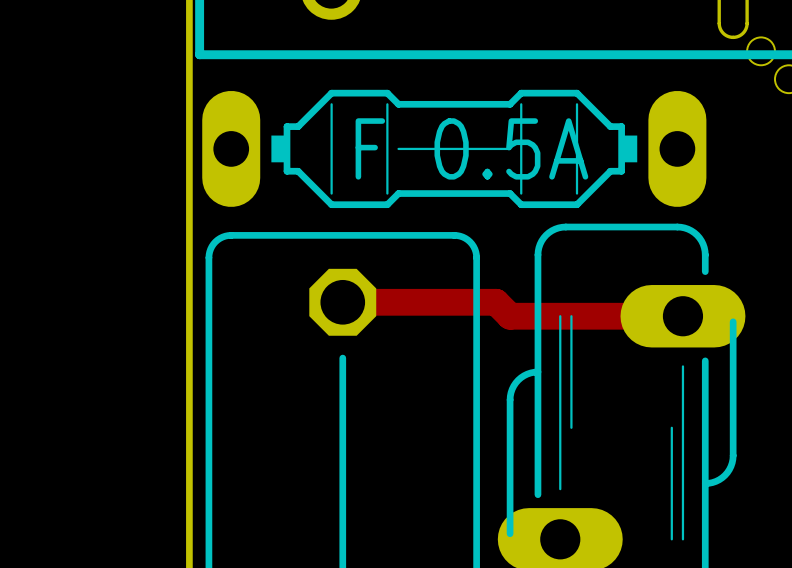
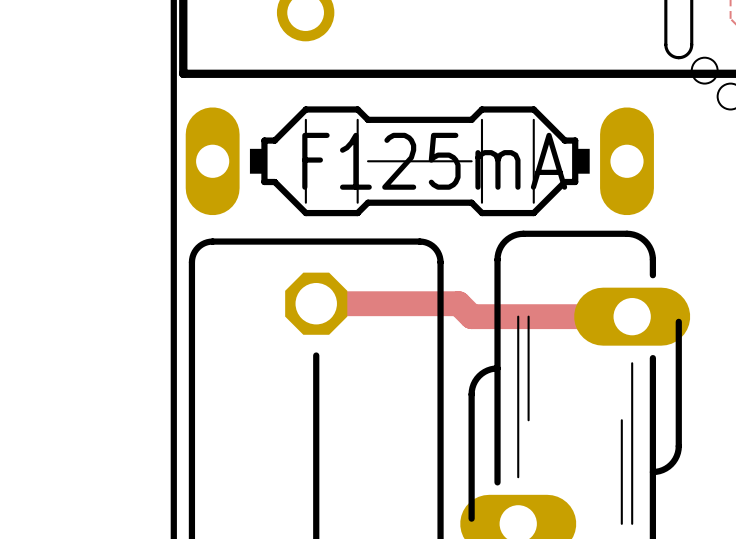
text: F 0.5A (471, 148) -> F125mA (434, 161)

